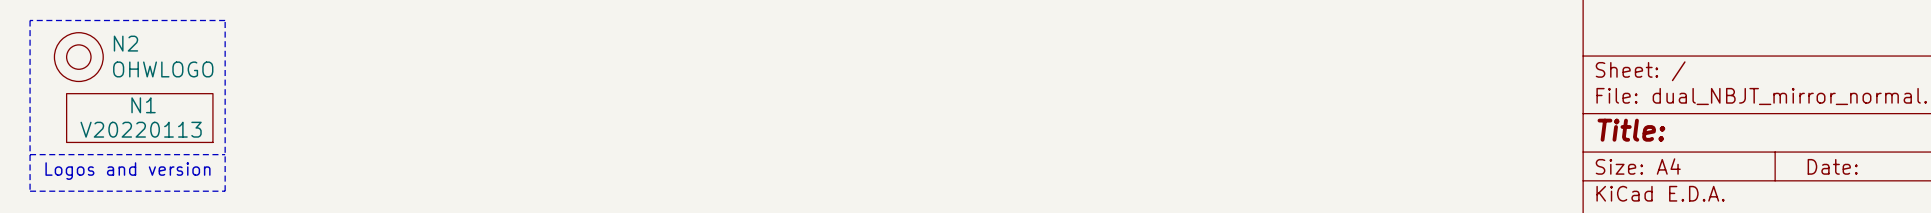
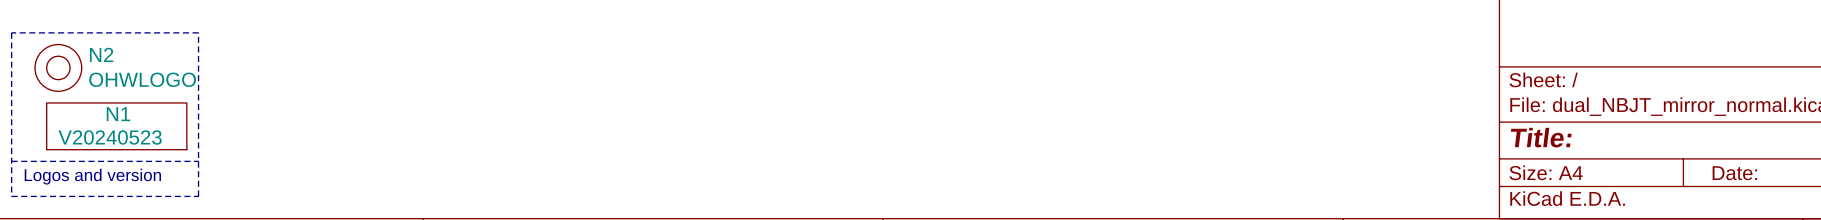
N1 value: V20220113 (141, 129) -> V20240523 (110, 137)

